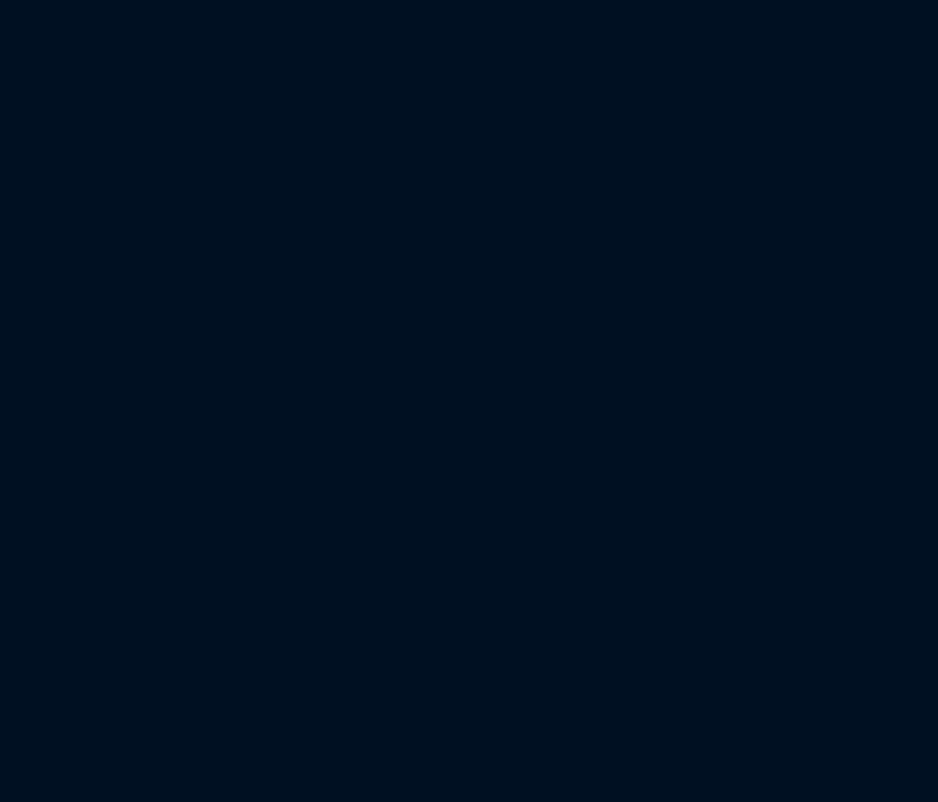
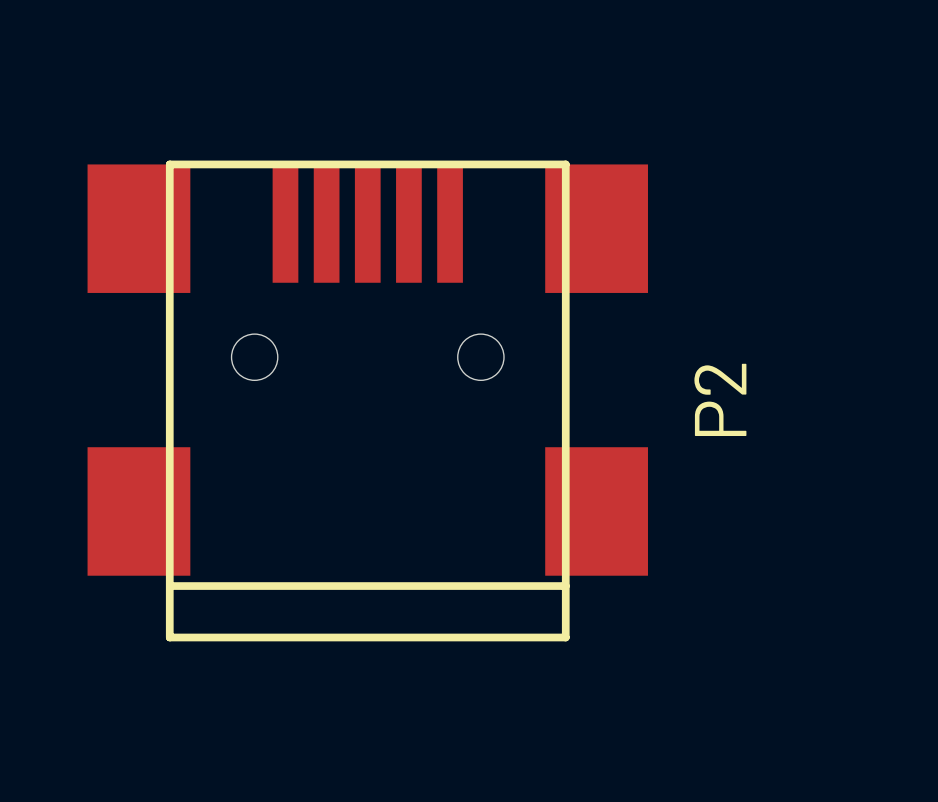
P2: none -> (367, 400)

